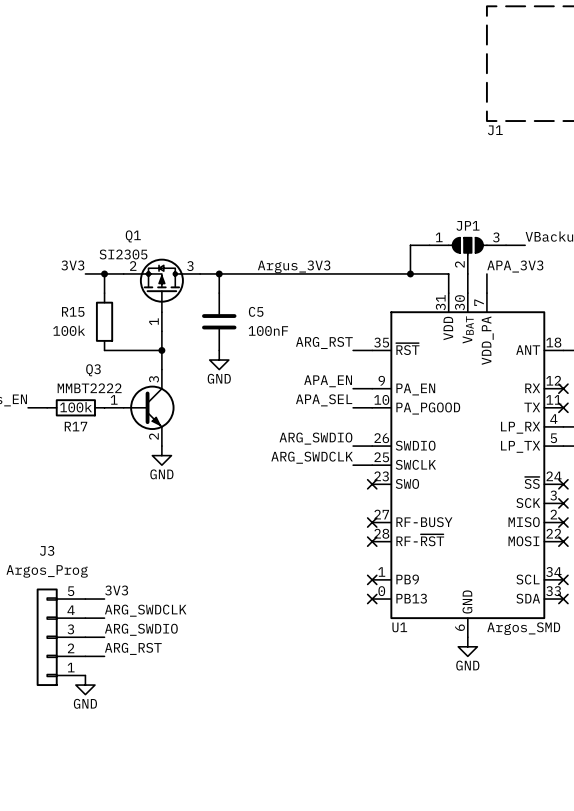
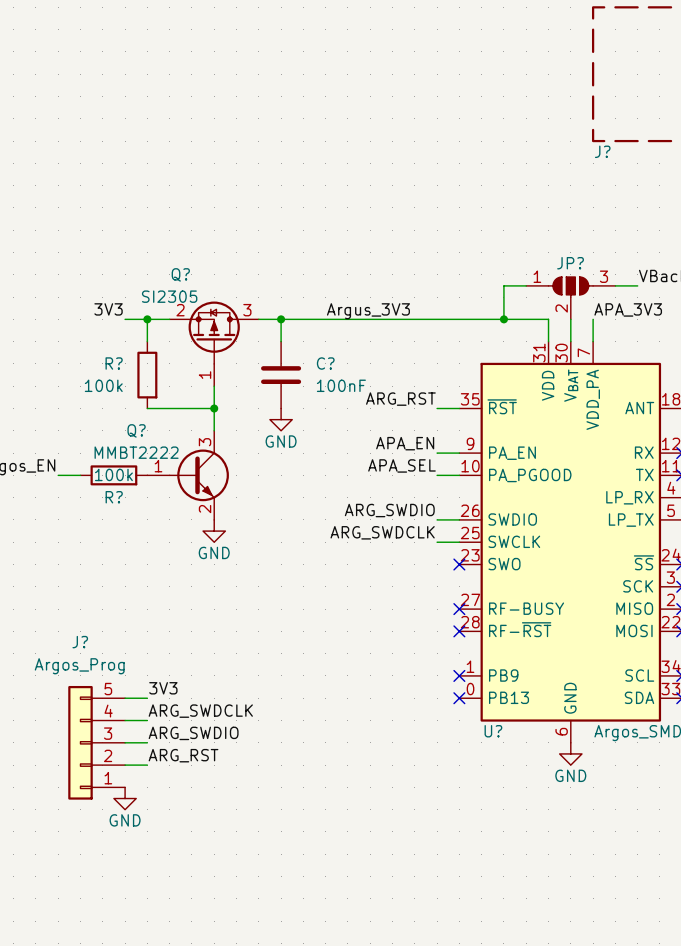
J1 name: J1 (495, 130) -> J? (602, 151)
JP1 name: JP1 (468, 225) -> JP? (570, 263)
Q1 name: Q1 (133, 236) -> Q? (180, 274)
R15 name: R15 (73, 311) -> R? (114, 363)
C5 name: C5 (256, 311) -> C? (325, 363)
Q3 name: Q3 (93, 370) -> Q? (136, 430)
R17 name: R17 (76, 426) -> R? (114, 497)
J3 name: J3 (47, 550) -> J? (80, 642)
U1 name: U1 (399, 627) -> U? (493, 731)

